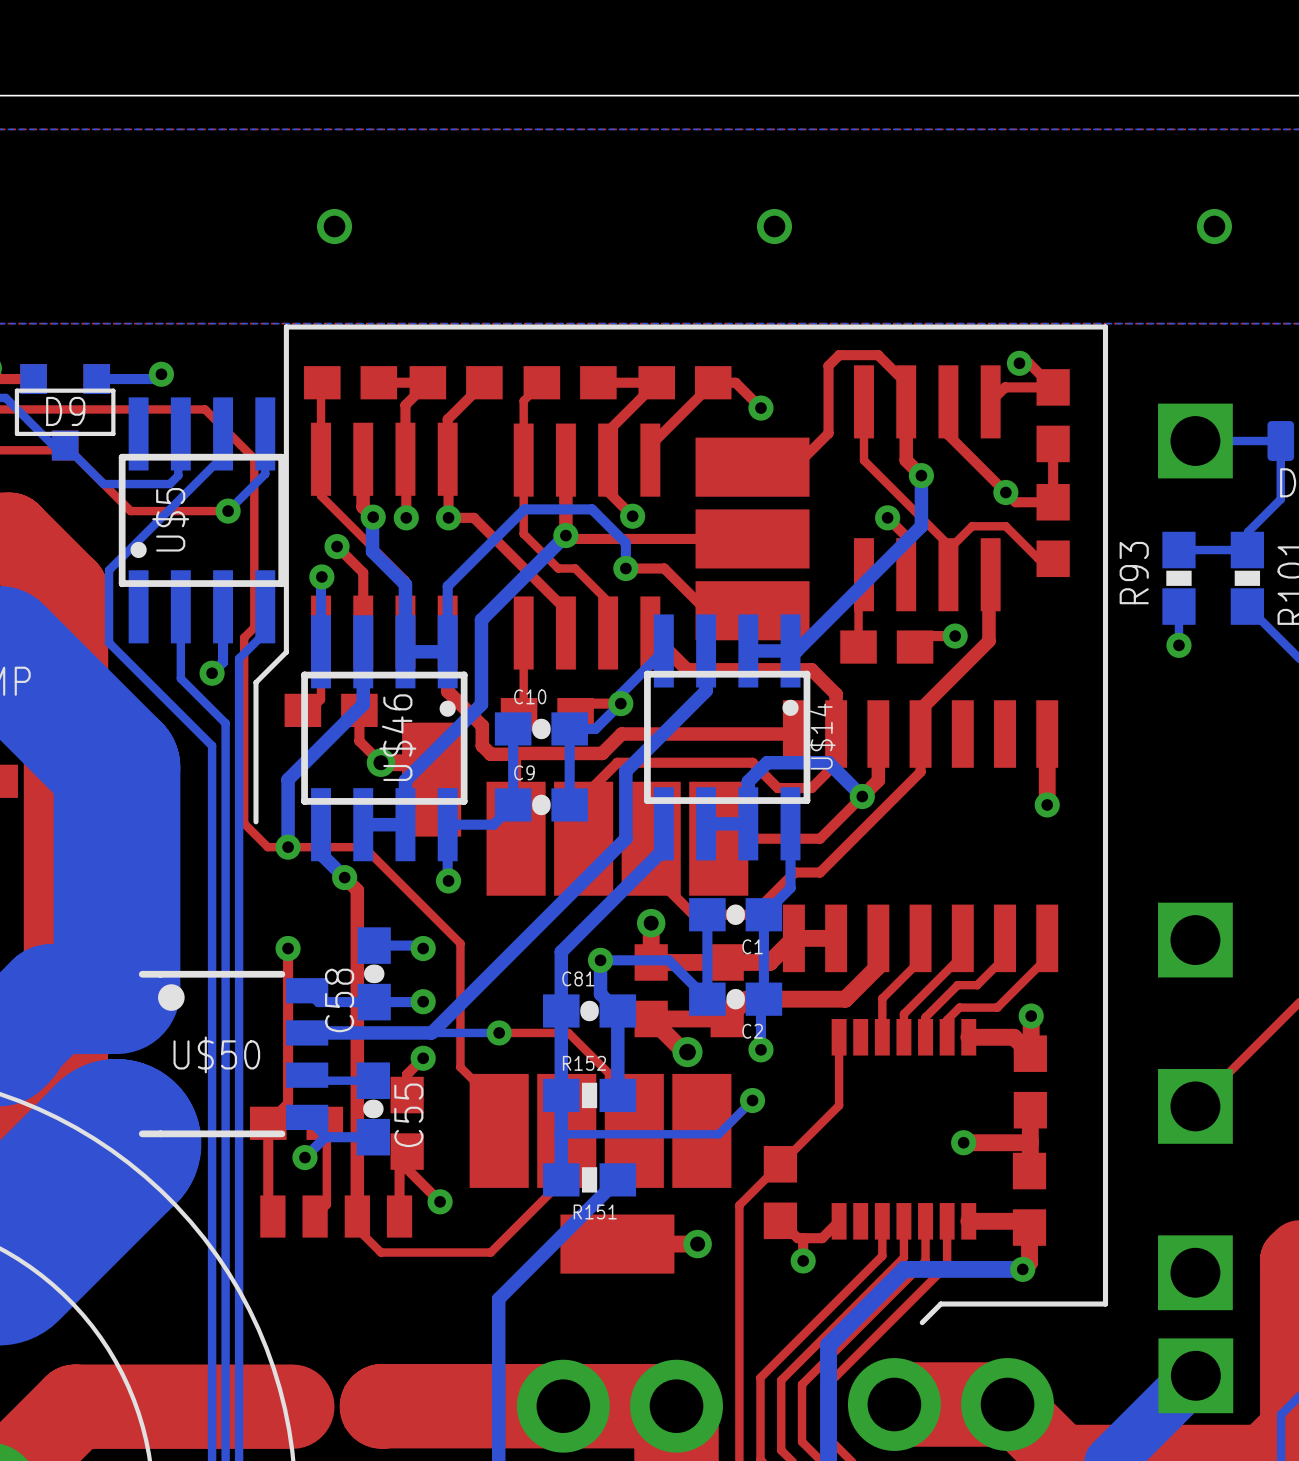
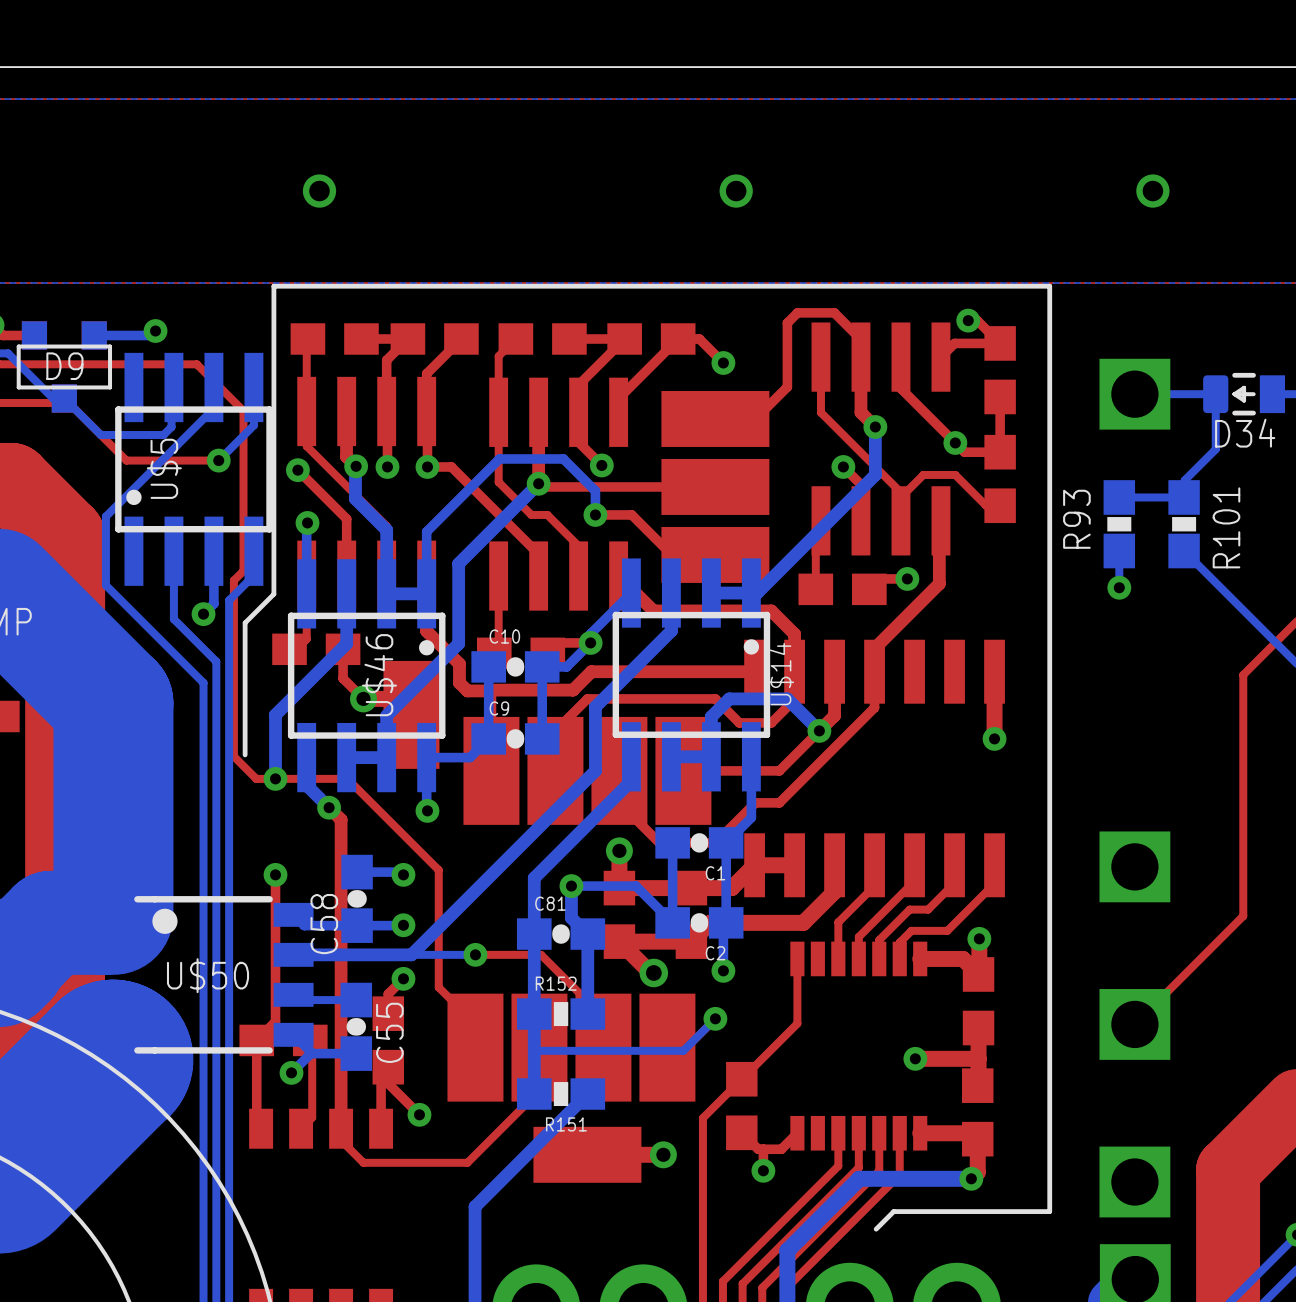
top track: none -> (297, 470) (321, 494)
via position: (337, 546) -> (297, 470)

